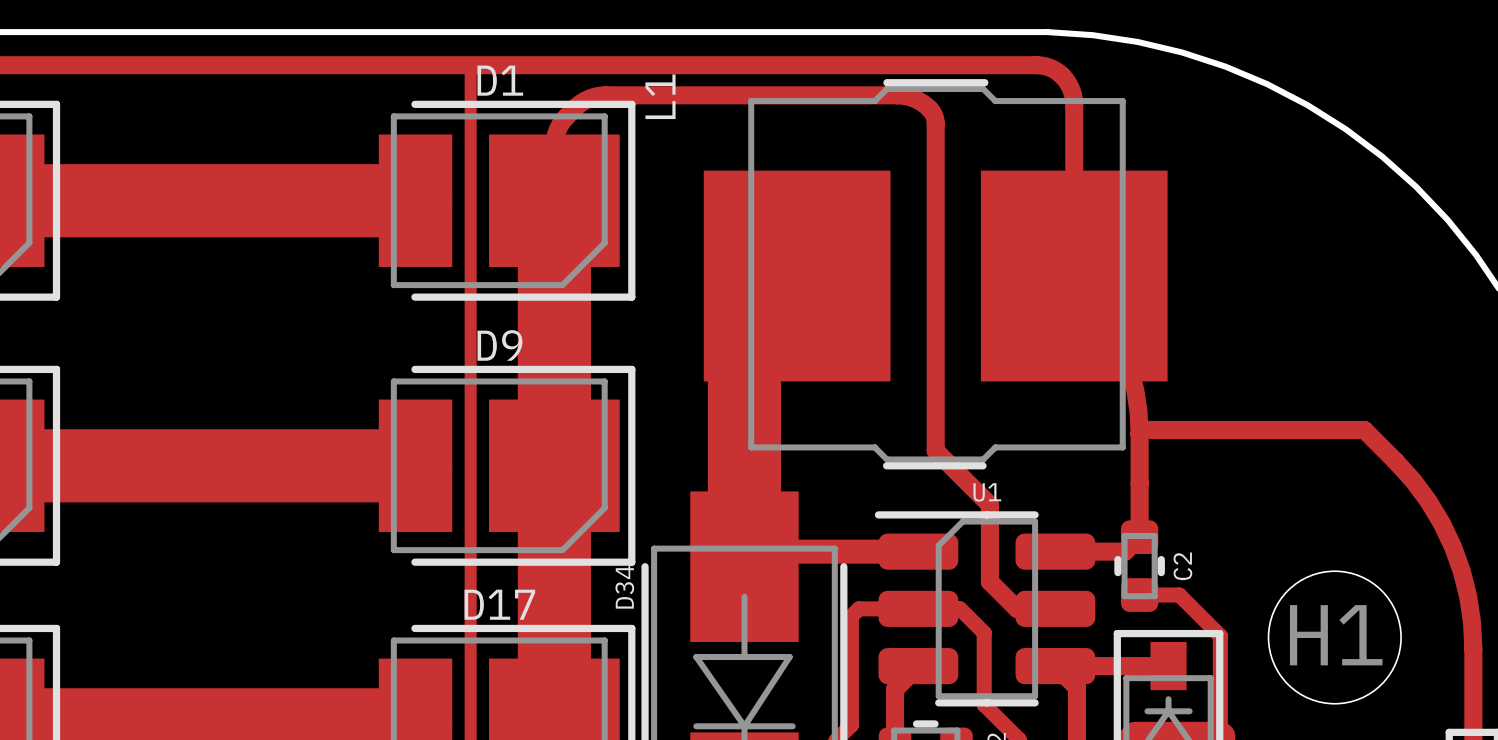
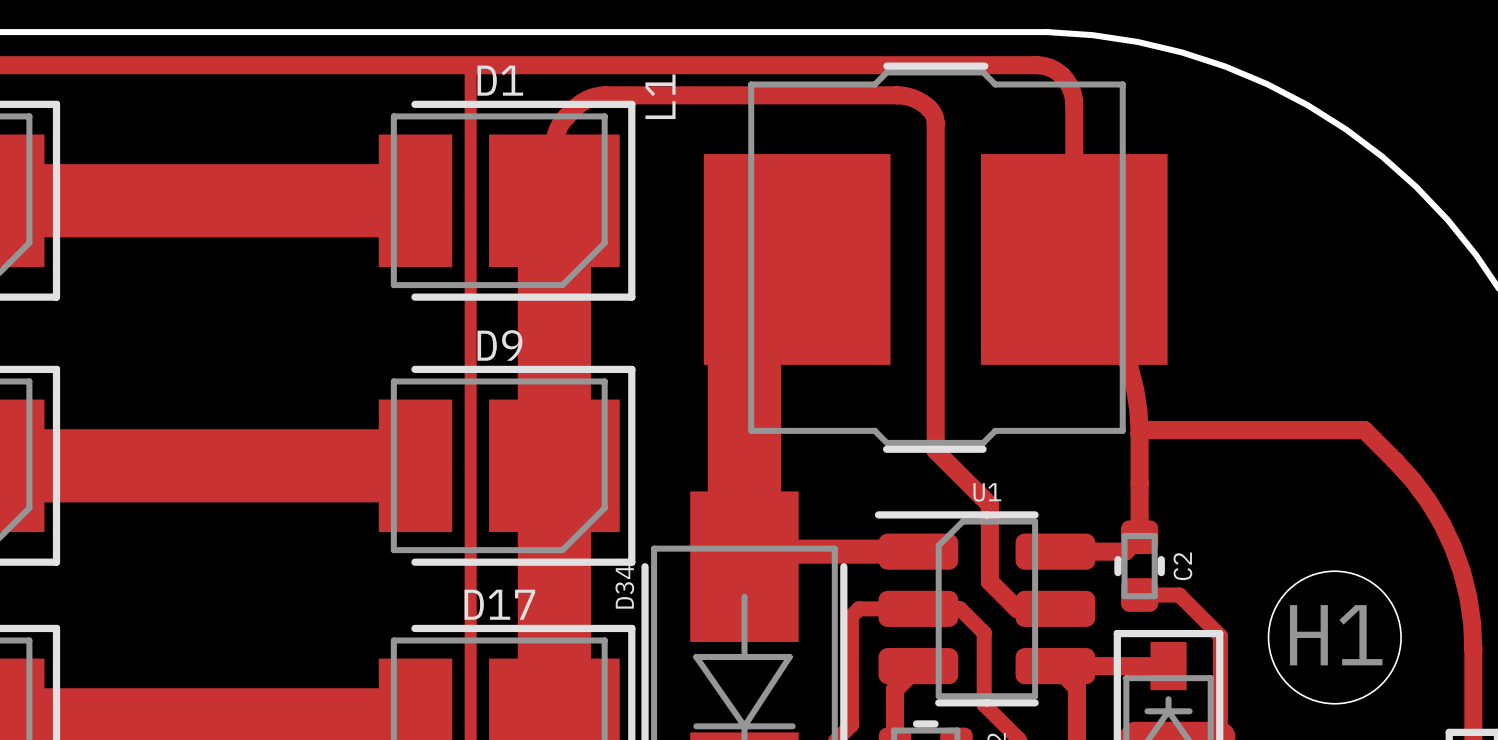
L1 position: (935, 274) -> (935, 257)

